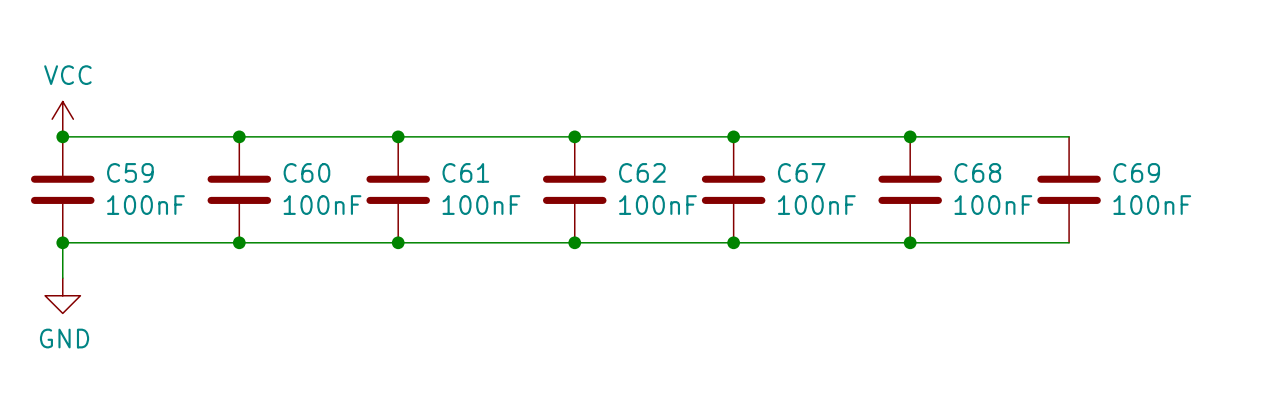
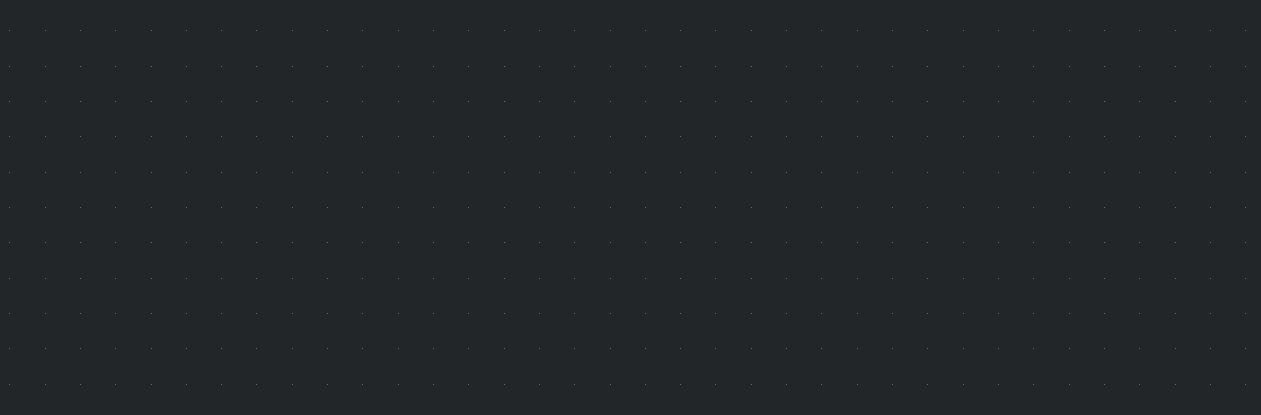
power symbol: VCC (62, 119) -> none
wire: (62, 136) (1069, 136) -> none
junction: (62, 136) -> none
junction: (239, 136) -> none
junction: (398, 136) -> none
junction: (574, 136) -> none
junction: (733, 136) -> none
junction: (910, 136) -> none
C59: 100nF (62, 189) -> none
C60: 100nF (239, 189) -> none
C61: 100nF (398, 189) -> none
C62: 100nF (574, 189) -> none
C67: 100nF (733, 189) -> none
C68: 100nF (910, 189) -> none
C69: 100nF (1069, 189) -> none
junction: (62, 242) -> none
junction: (239, 242) -> none
junction: (398, 242) -> none
junction: (574, 242) -> none
junction: (733, 242) -> none
junction: (910, 242) -> none
wire: (1069, 242) (62, 242) (62, 278) -> none
power symbol: GND (62, 295) -> none

